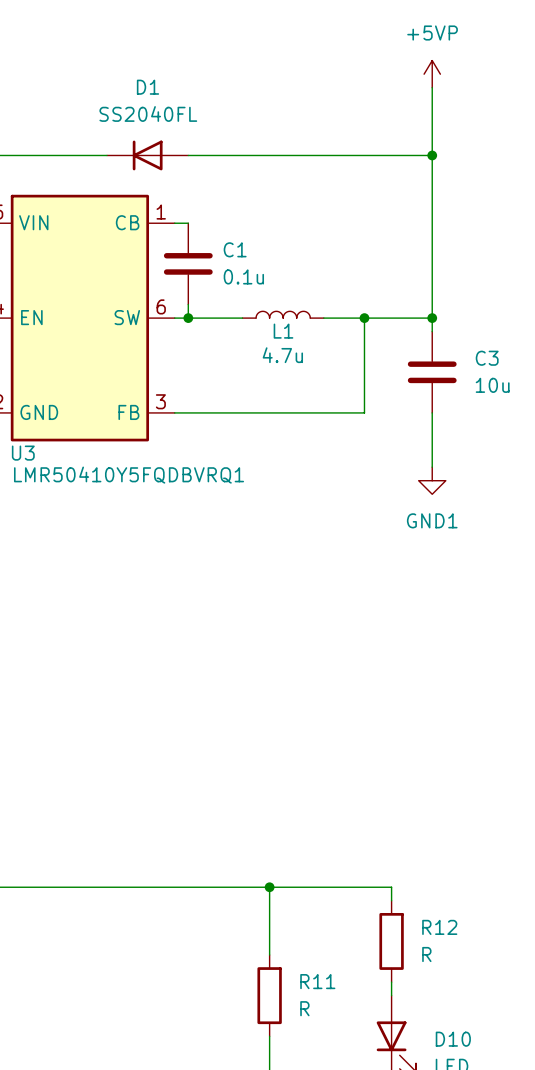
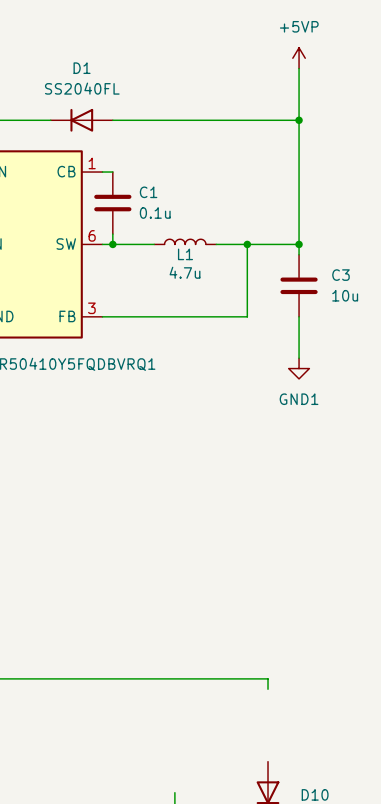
wire: (269, 887) (269, 955) -> none
junction: (269, 887) -> none
R12: R (391, 941) -> none
wire: (391, 982) (391, 995) -> none
R11: R (269, 995) -> none

